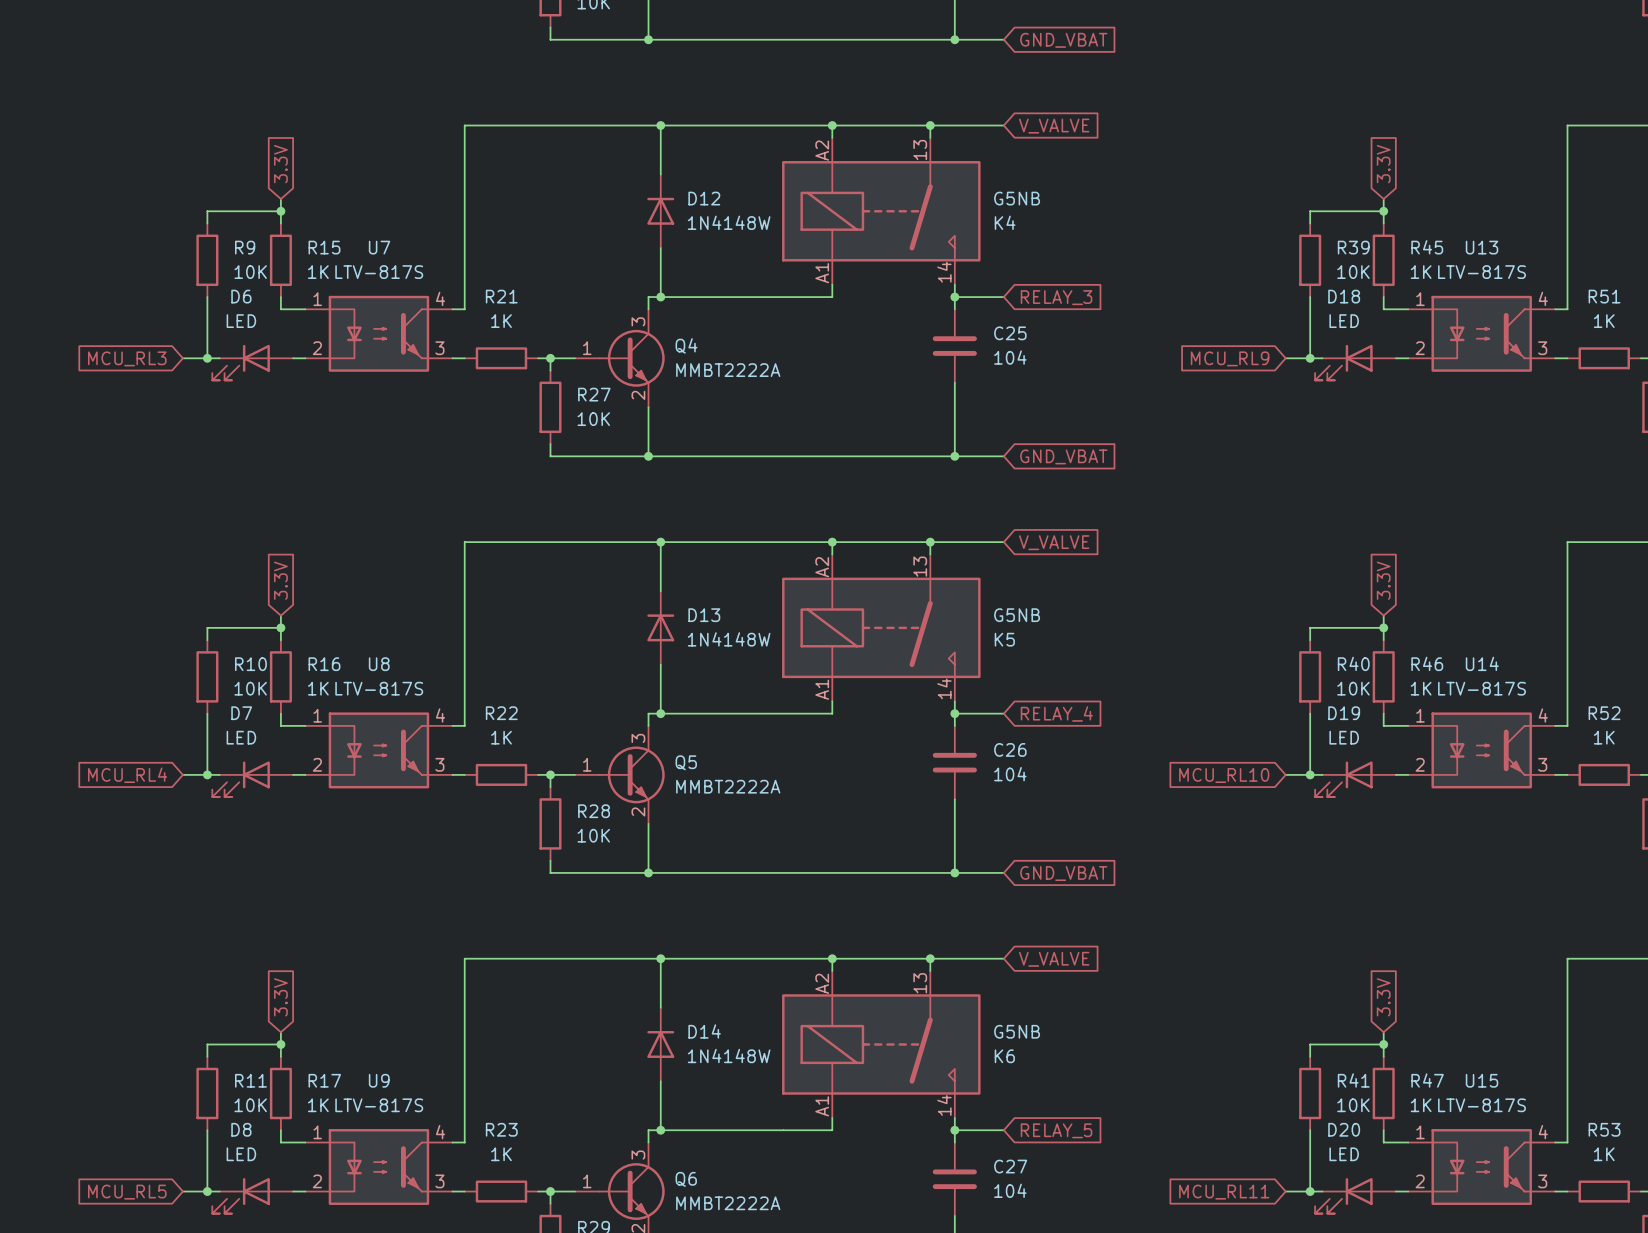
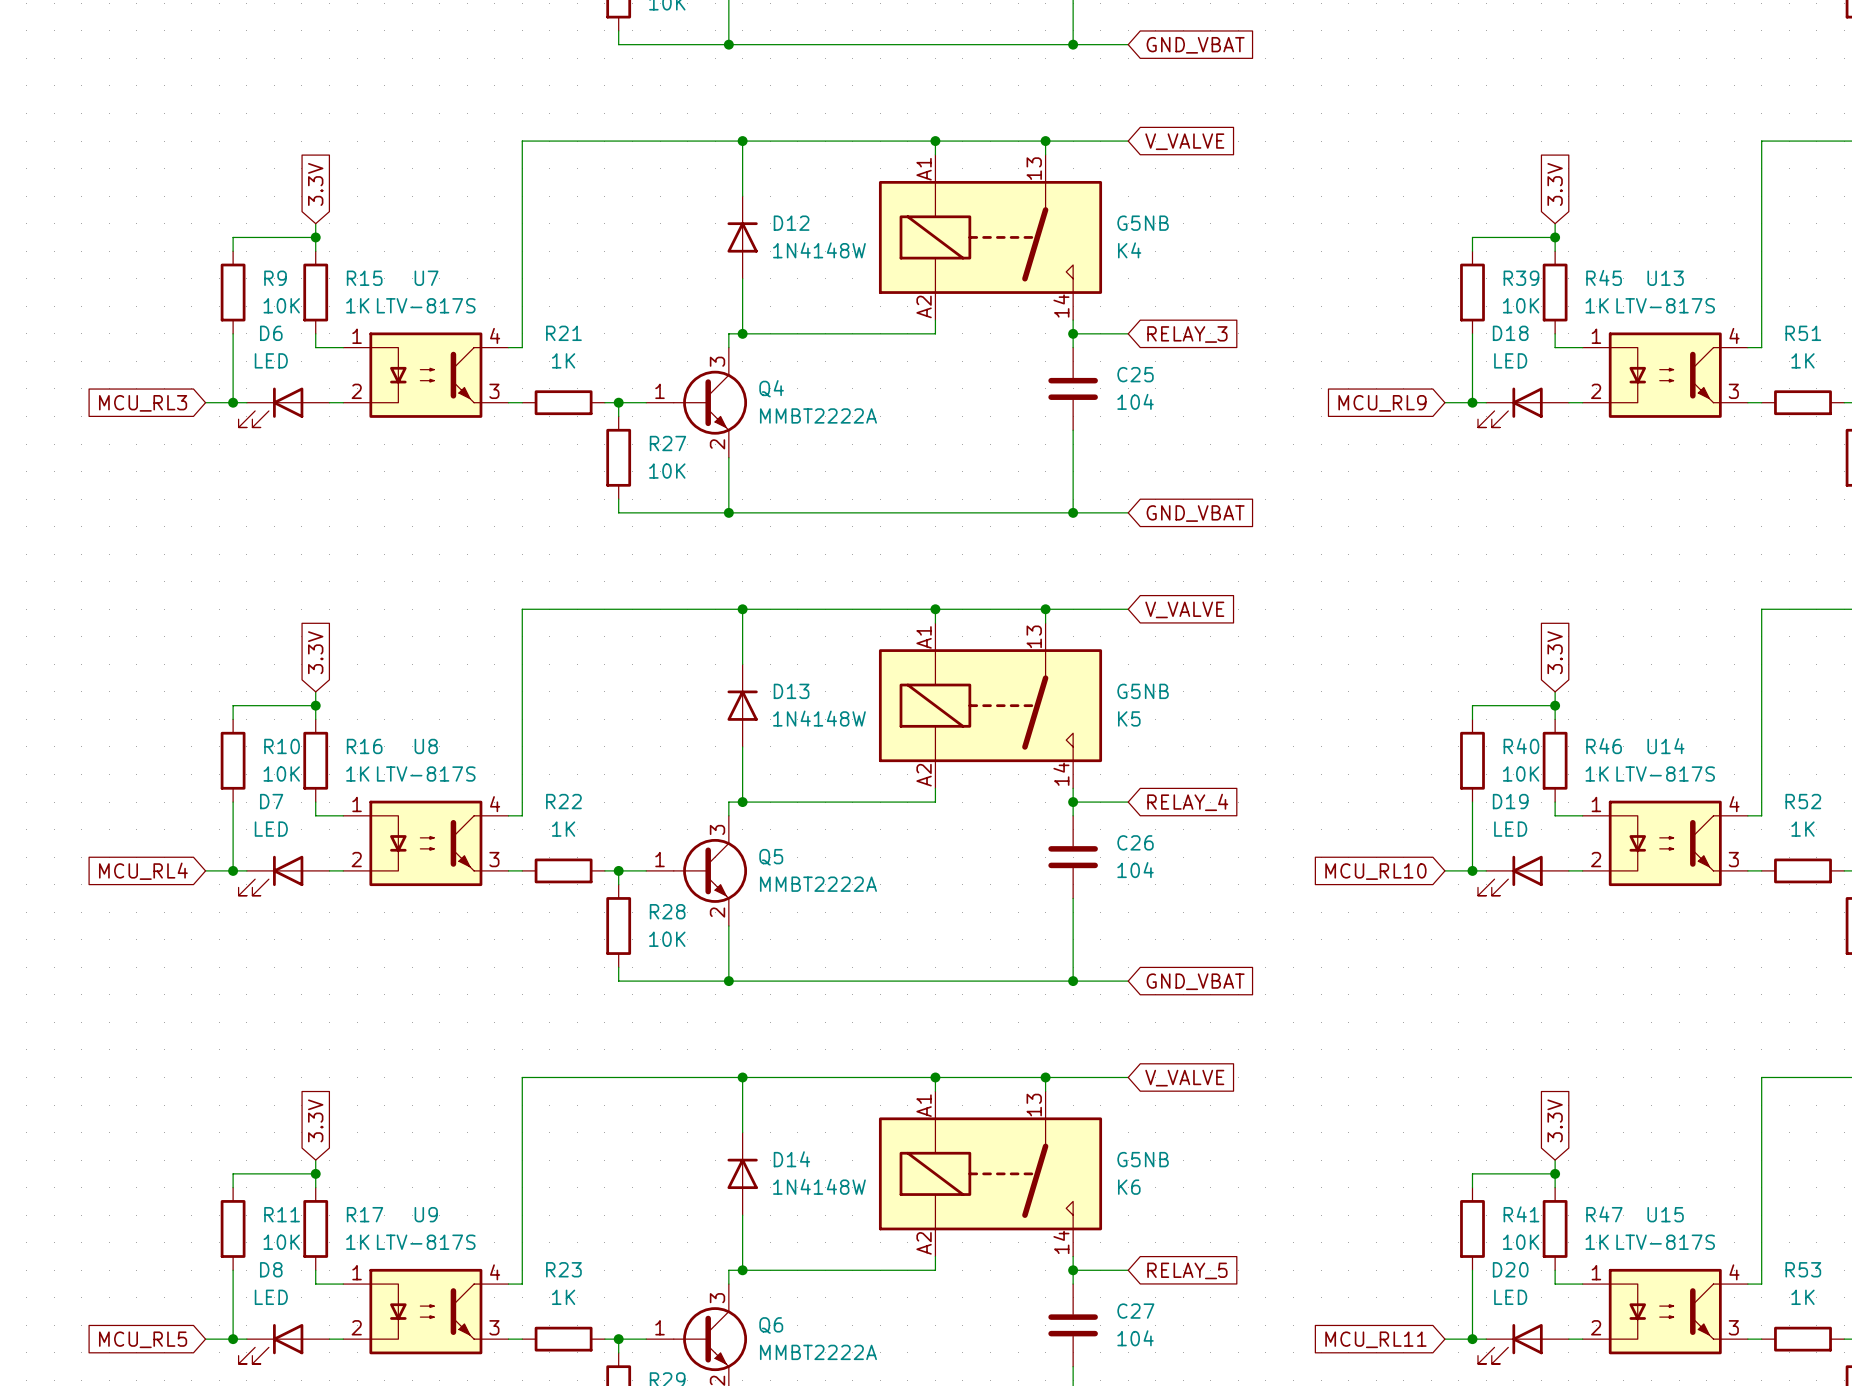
K4 pin number: A2 (822, 150) -> A1 (924, 169)
K4 pin number: A1 (822, 273) -> A2 (924, 306)
K5 pin number: A2 (822, 567) -> A1 (924, 637)
K5 pin number: A1 (822, 689) -> A2 (924, 775)
K6 pin number: A2 (822, 983) -> A1 (924, 1105)
K6 pin number: A1 (822, 1106) -> A2 (924, 1243)

